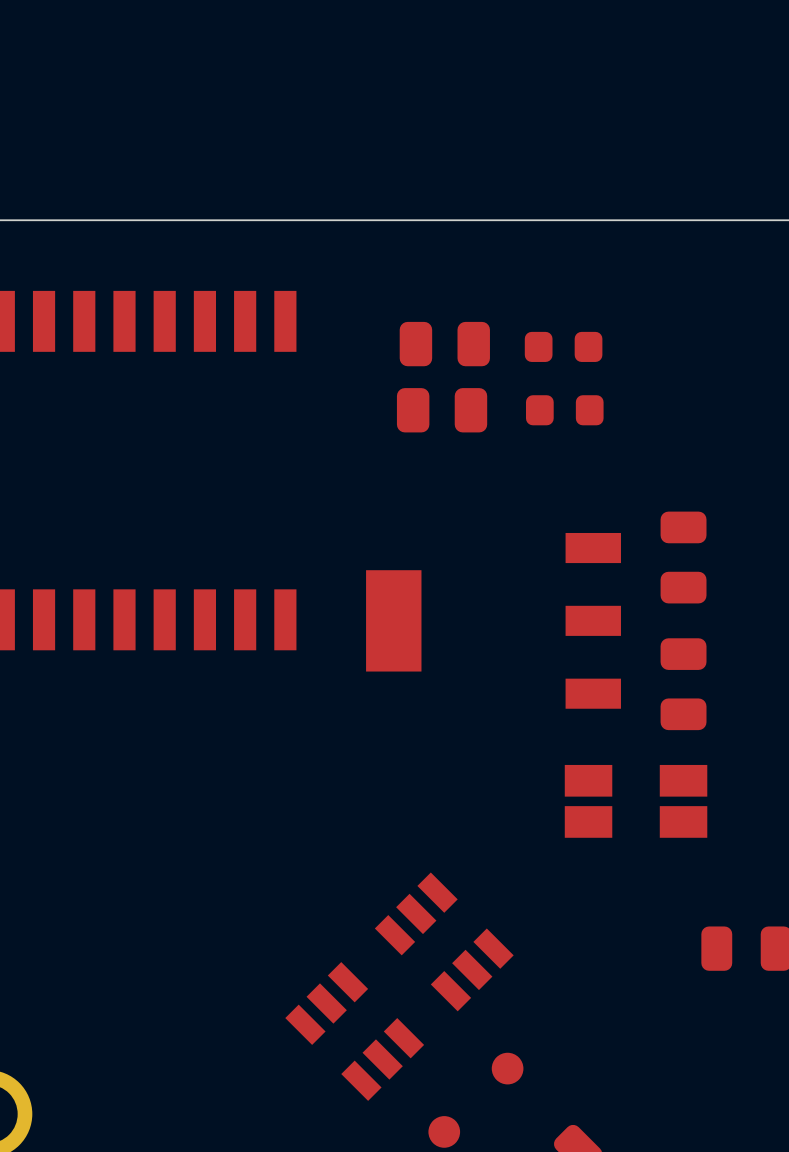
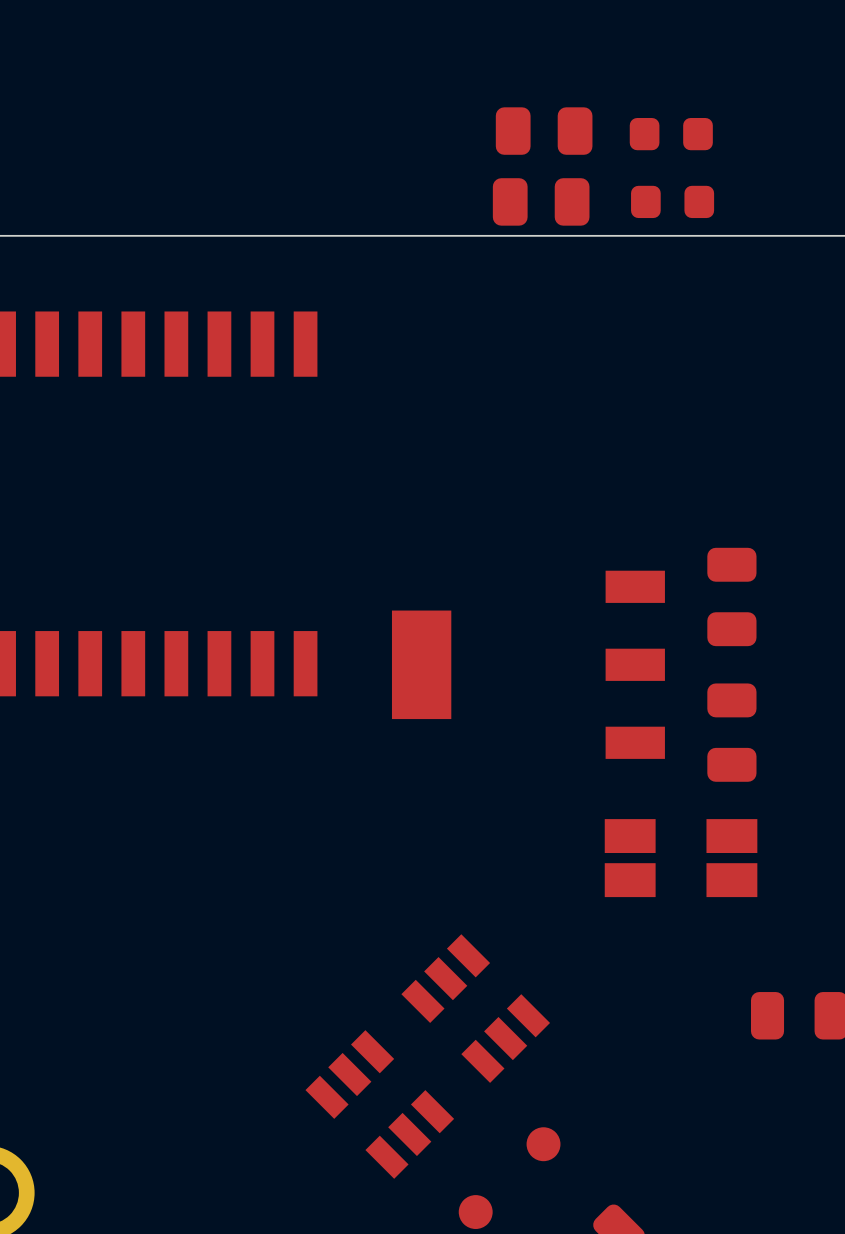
part: none -> (544, 131)
part: none -> (671, 134)
part: none -> (541, 201)
part: none -> (672, 201)
part: (444, 344) -> none
part: (563, 346) -> none
part: (442, 410) -> none
part: (564, 410) -> none

